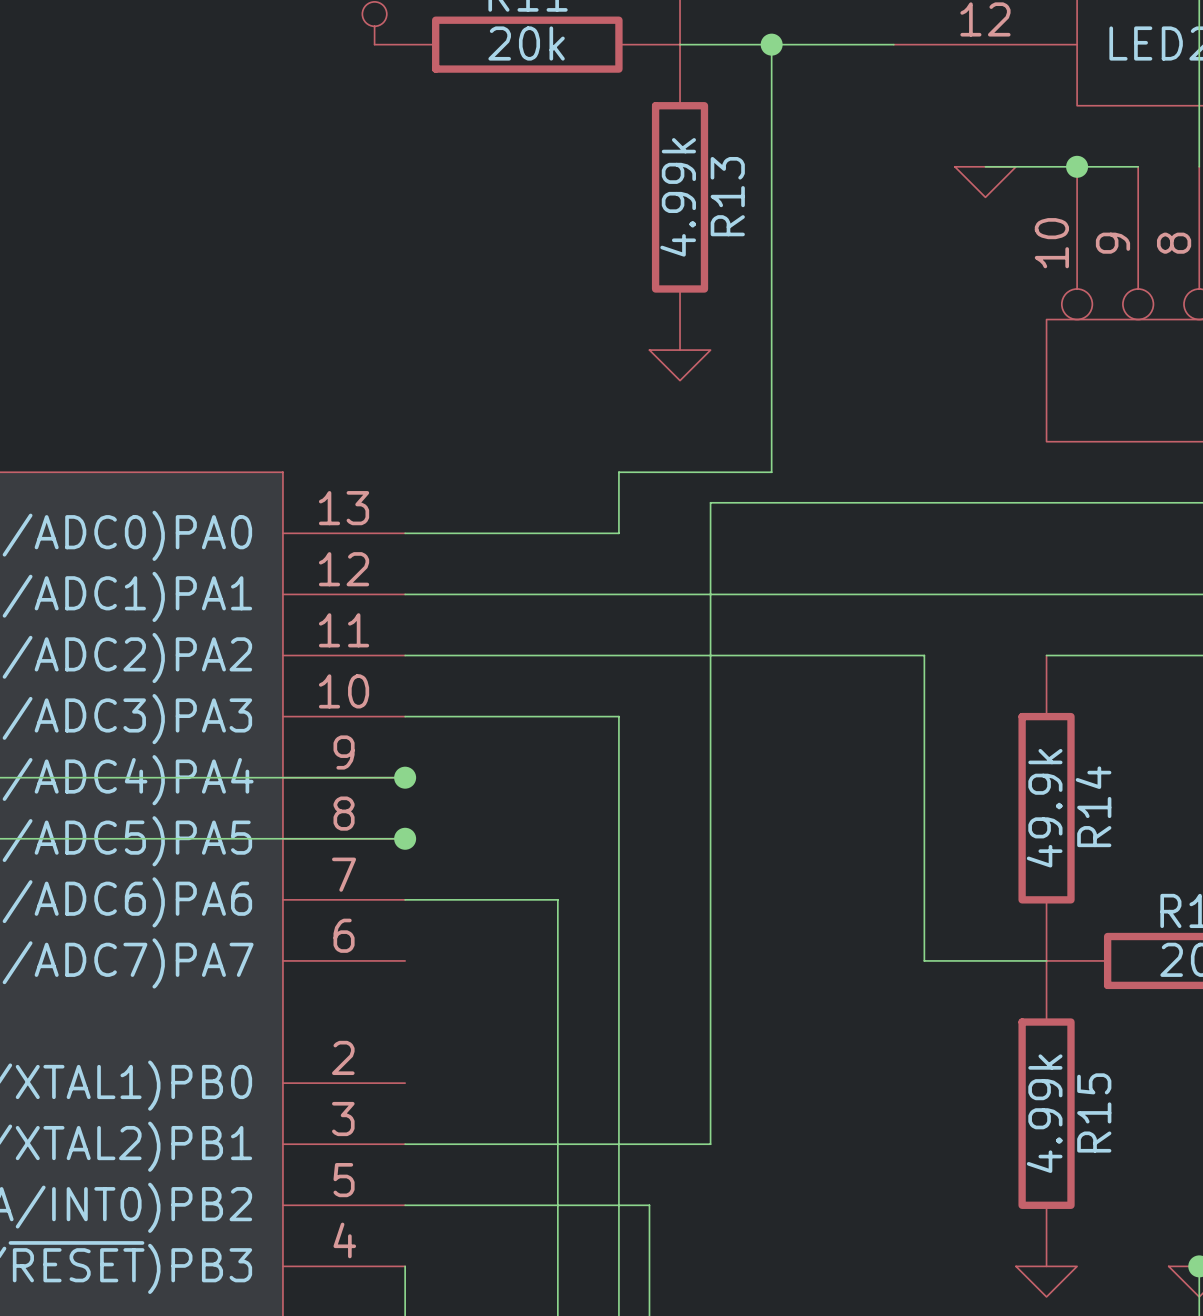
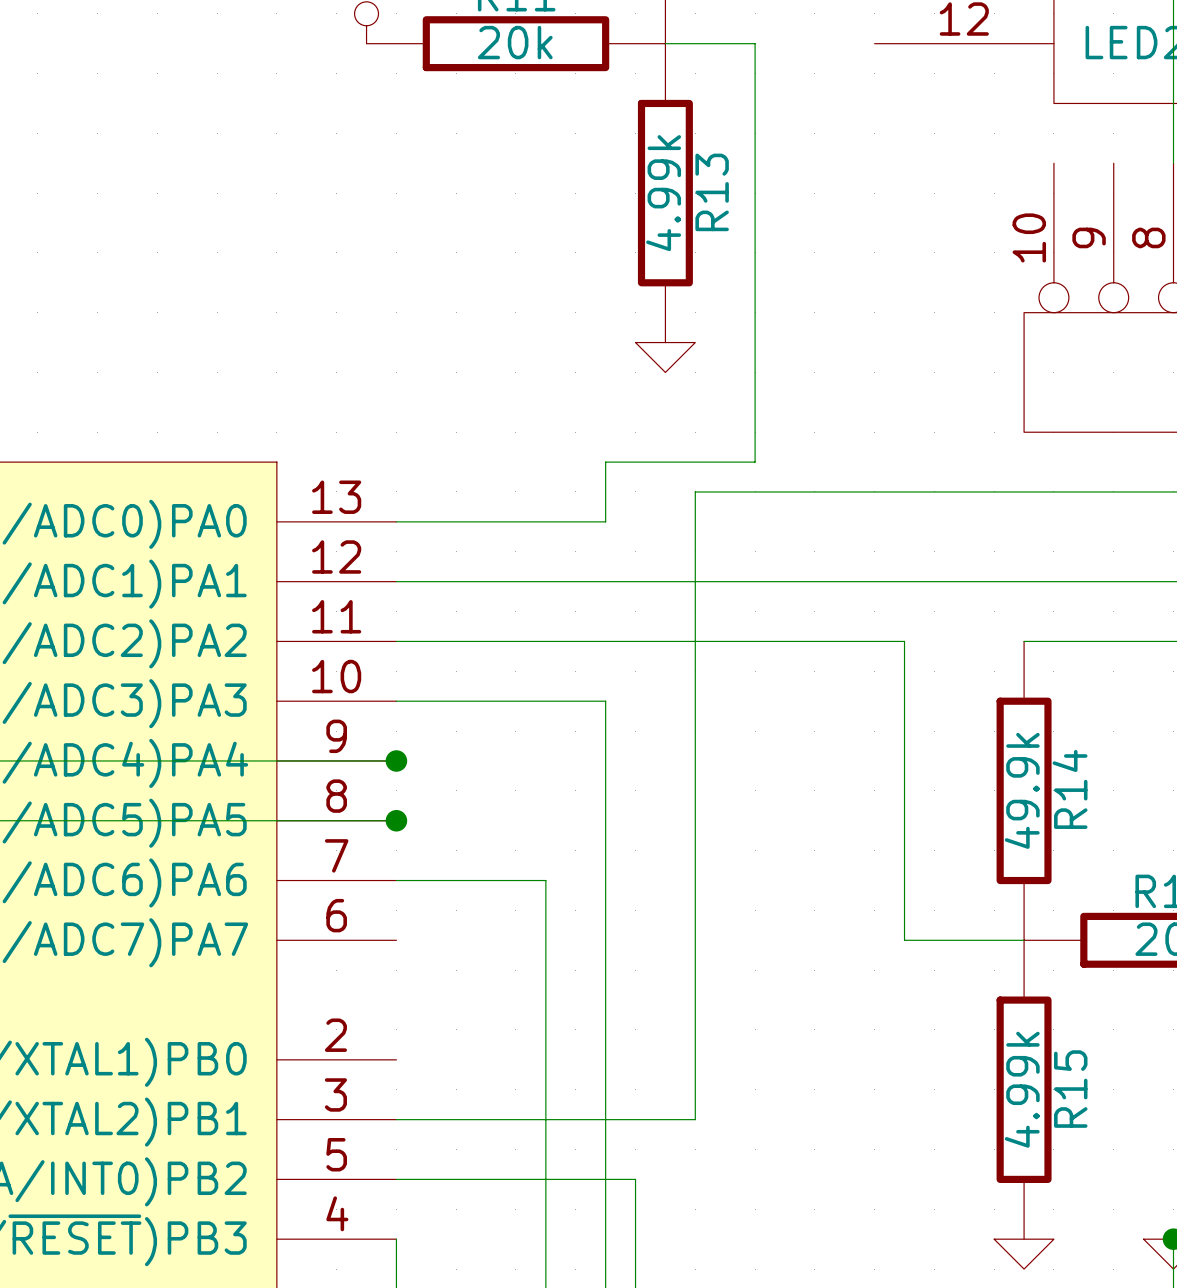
wire: (771, 44) (893, 44) -> none
junction: (771, 44) -> none
wire: (985, 166) (1138, 166) -> none
junction: (1077, 166) -> none
power symbol: (985, 182) -> none

